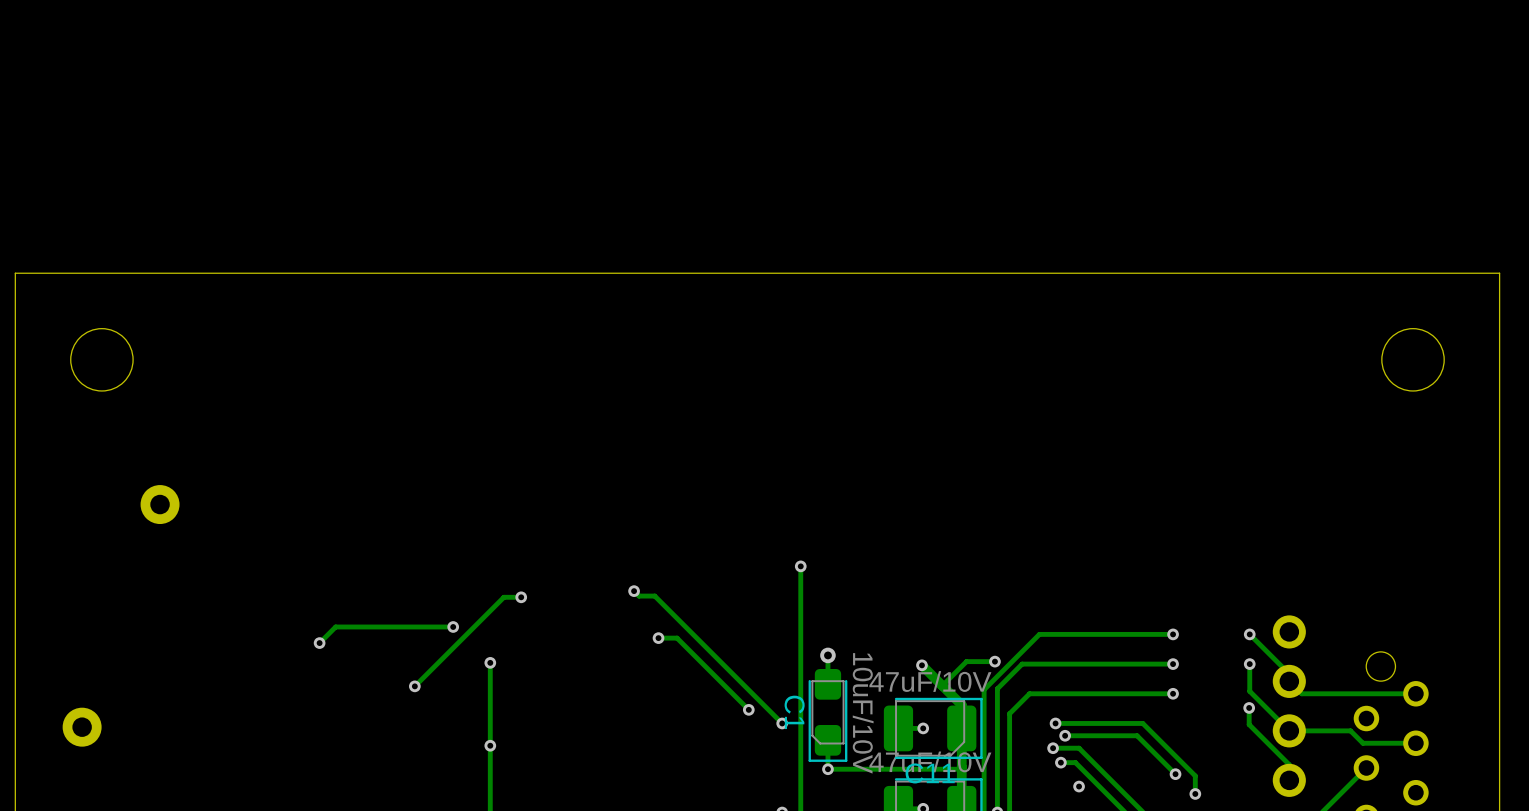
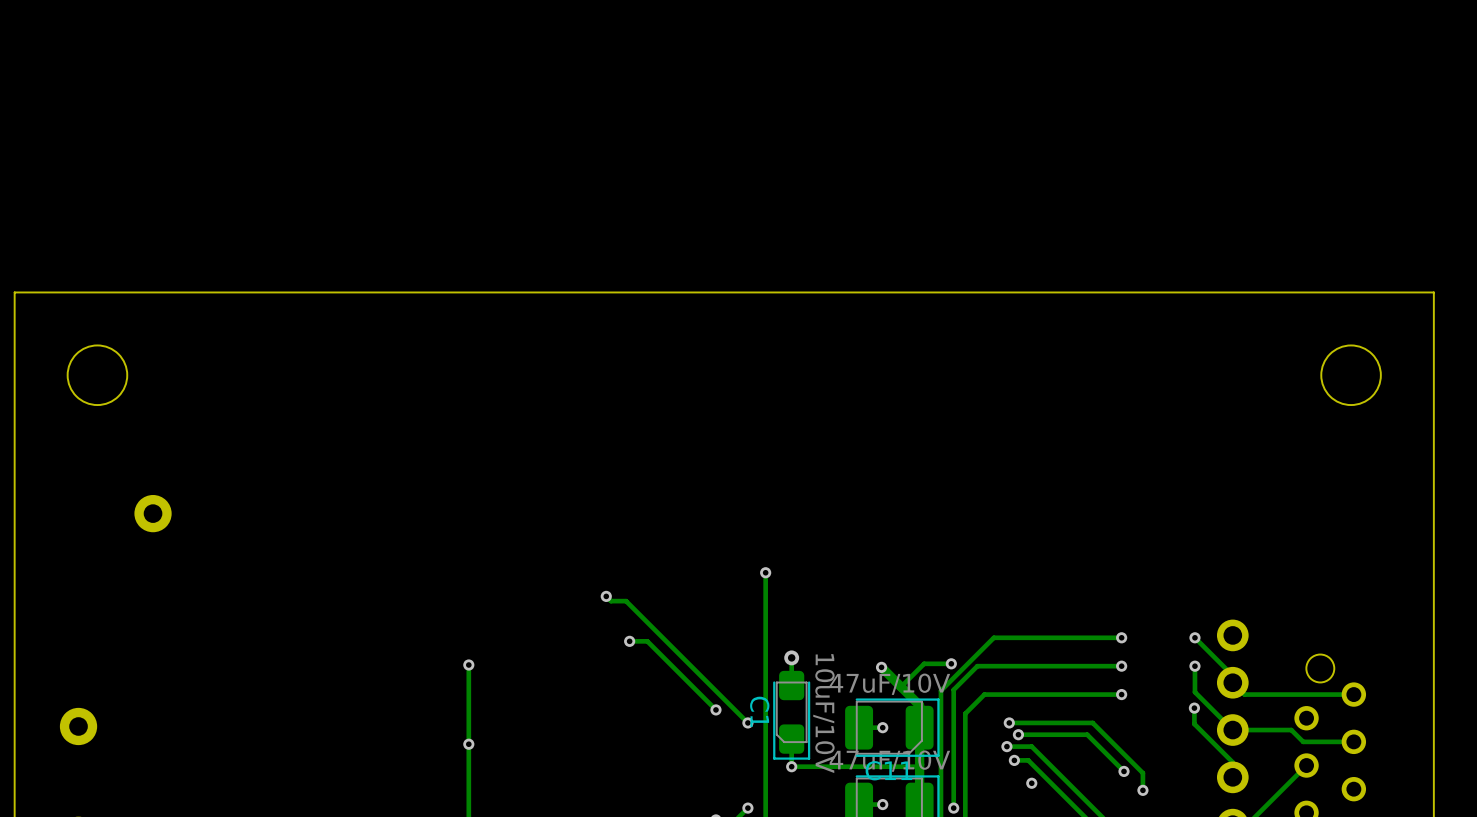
track: (521, 597) (503, 597) (414, 686) -> none
via: (521, 597) -> none
track: (453, 626) (335, 626) (319, 643) -> none
via: (453, 626) -> none
via: (319, 643) -> none
via: (414, 686) -> none

